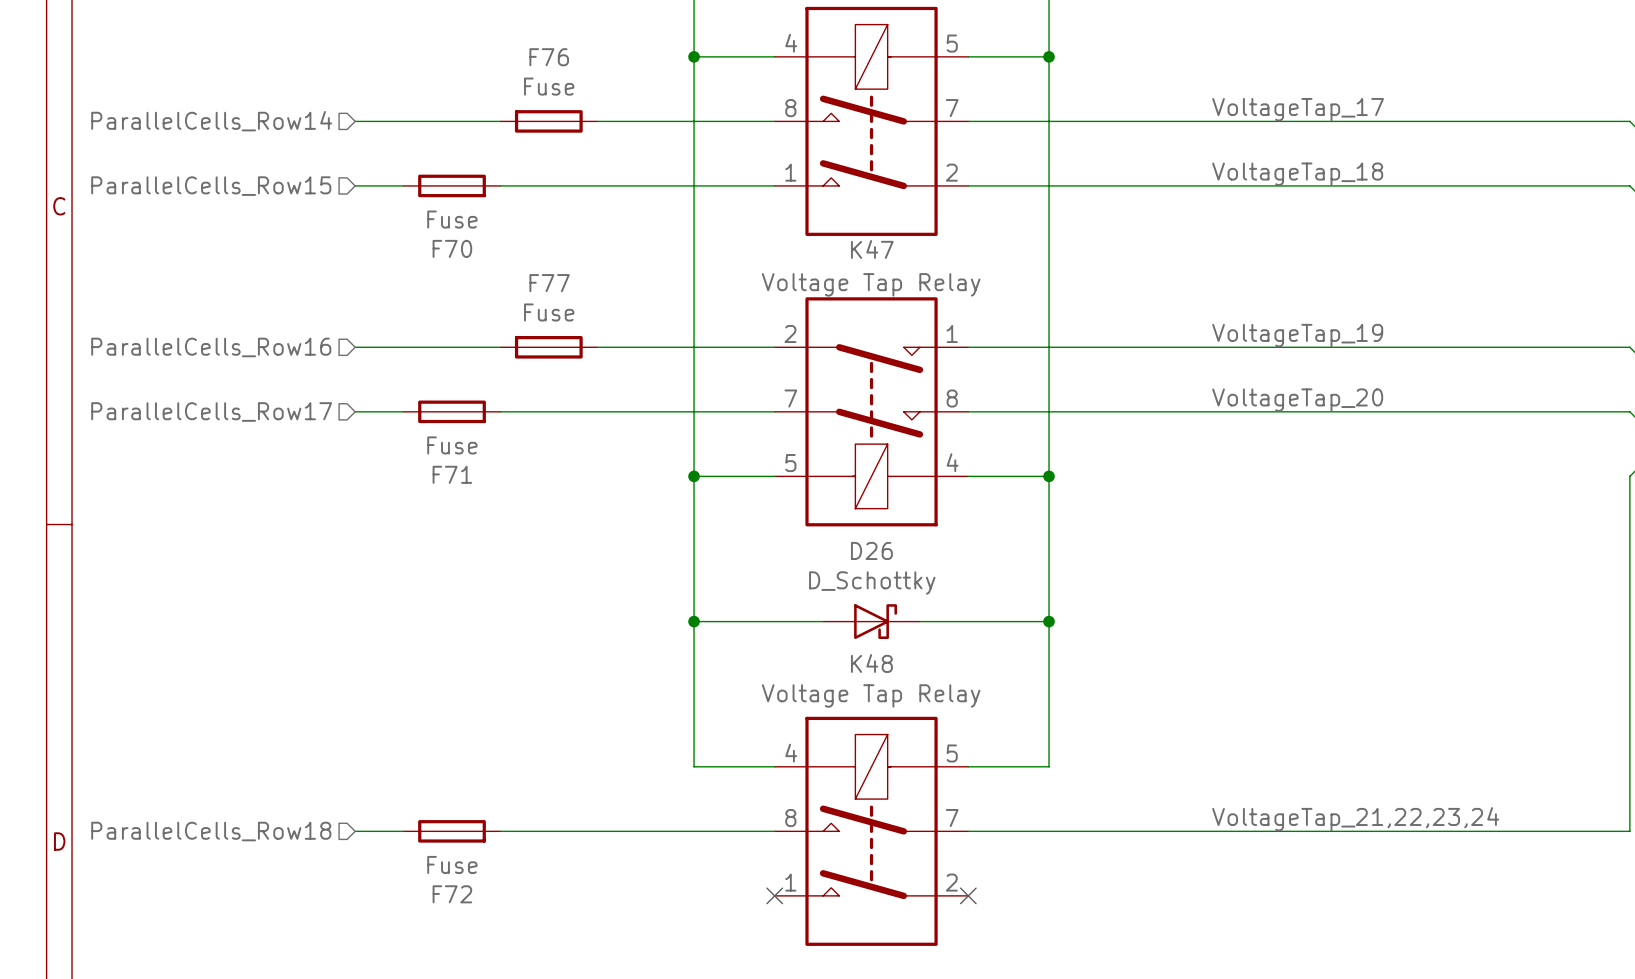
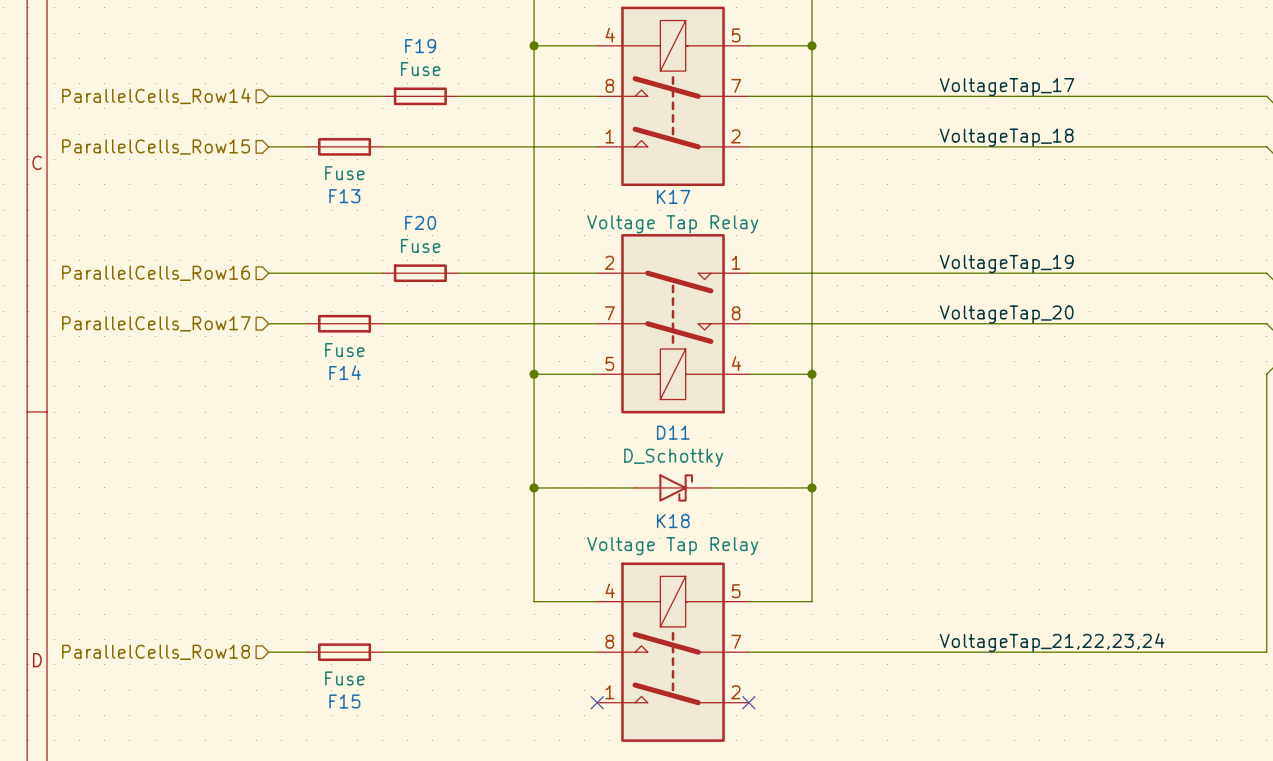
F76 name: F76 (549, 57) -> F19 (420, 46)
F70 name: F70 (452, 248) -> F13 (344, 196)
K47 name: K47 (872, 249) -> K17 (673, 196)
F77 name: F77 (549, 283) -> F20 (420, 222)
F71 name: F71 (452, 474) -> F14 (345, 372)
D26 name: D26 (871, 550) -> D11 (673, 432)
K48 name: K48 (871, 663) -> K18 (673, 521)
F72 name: F72 (452, 894) -> F15 (344, 701)

